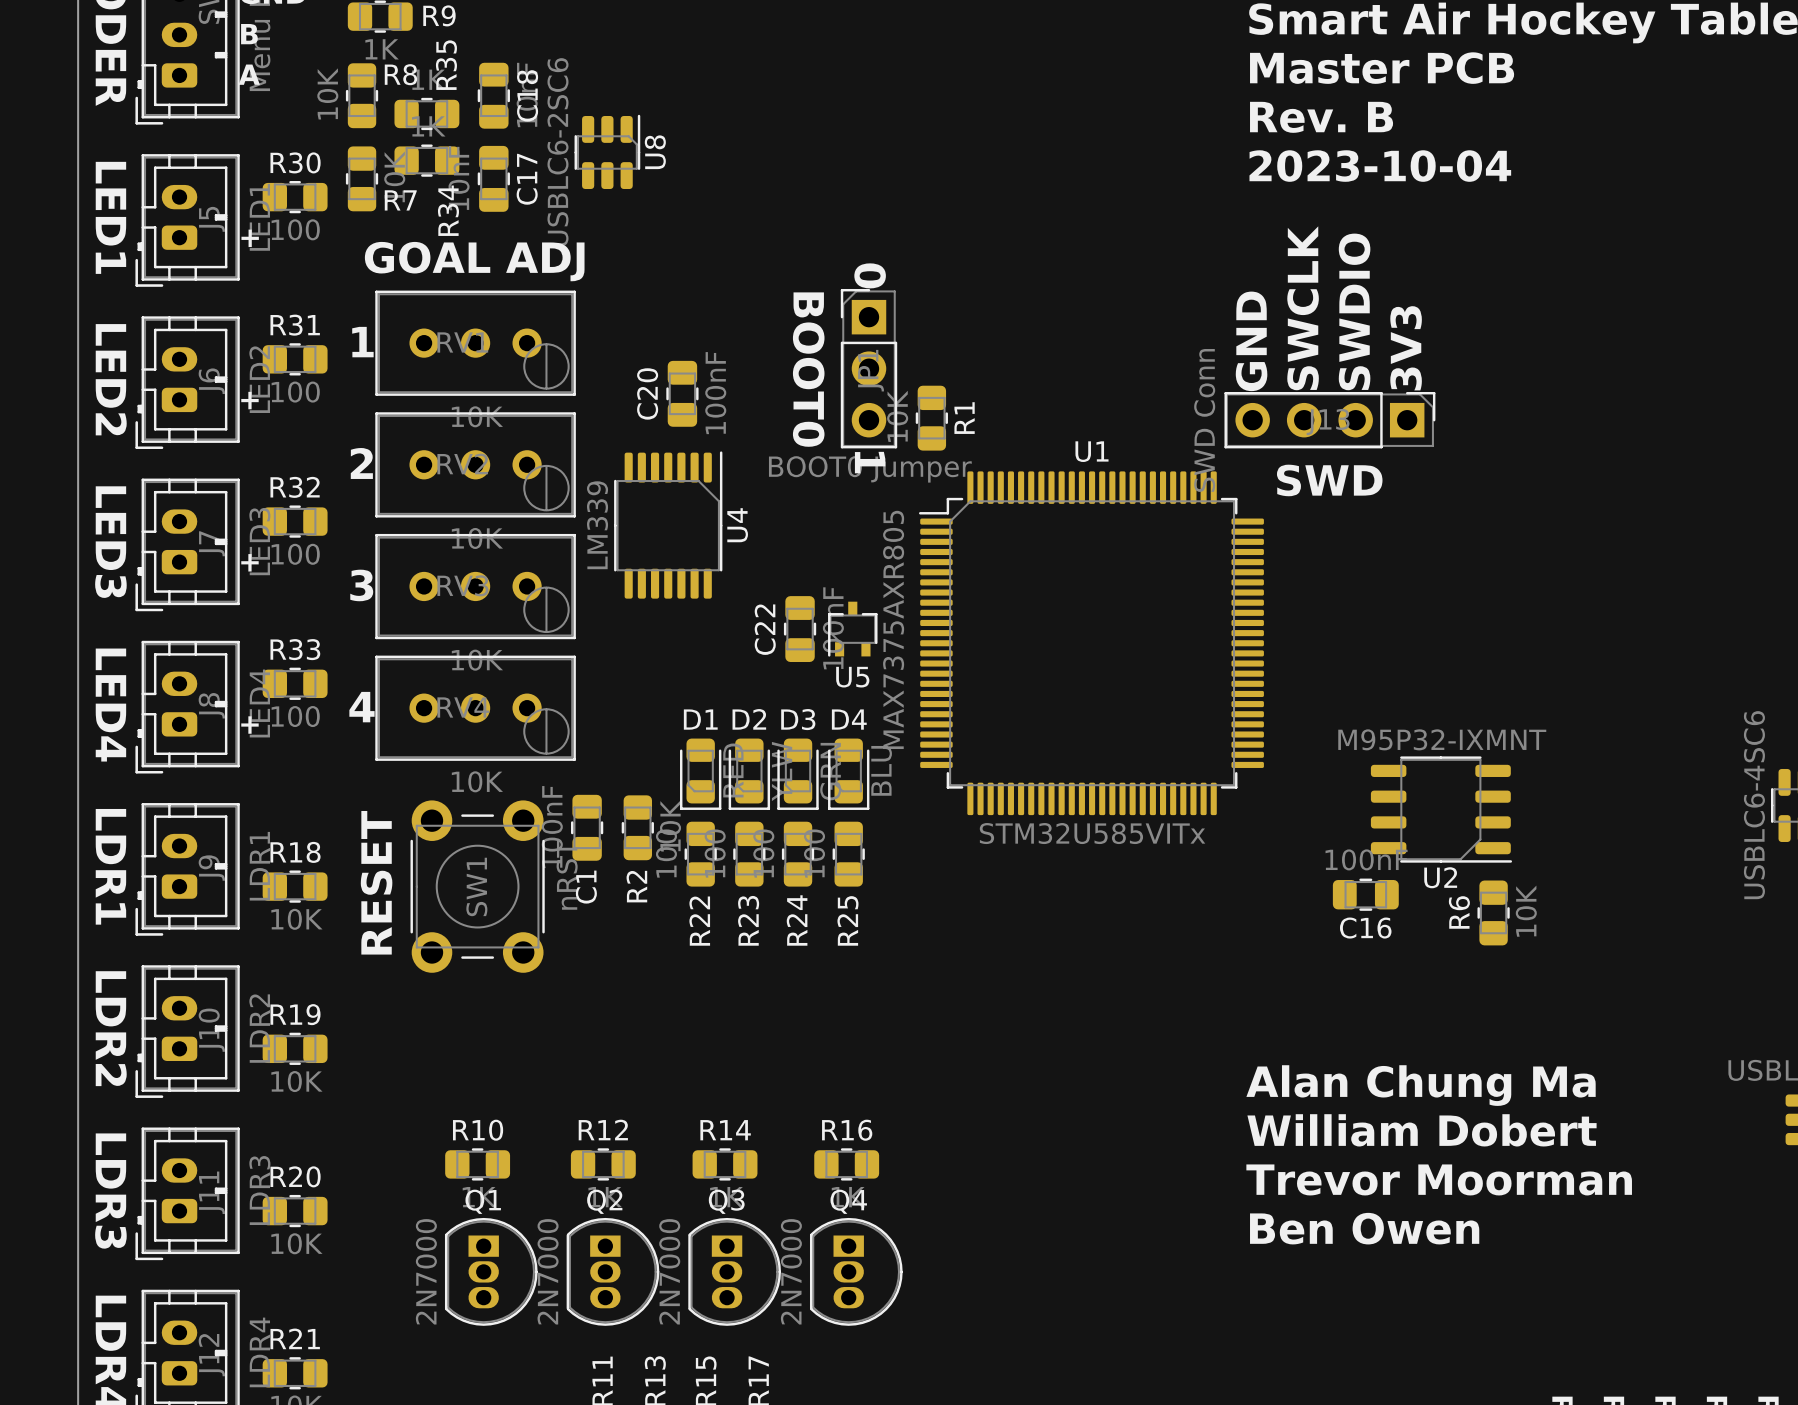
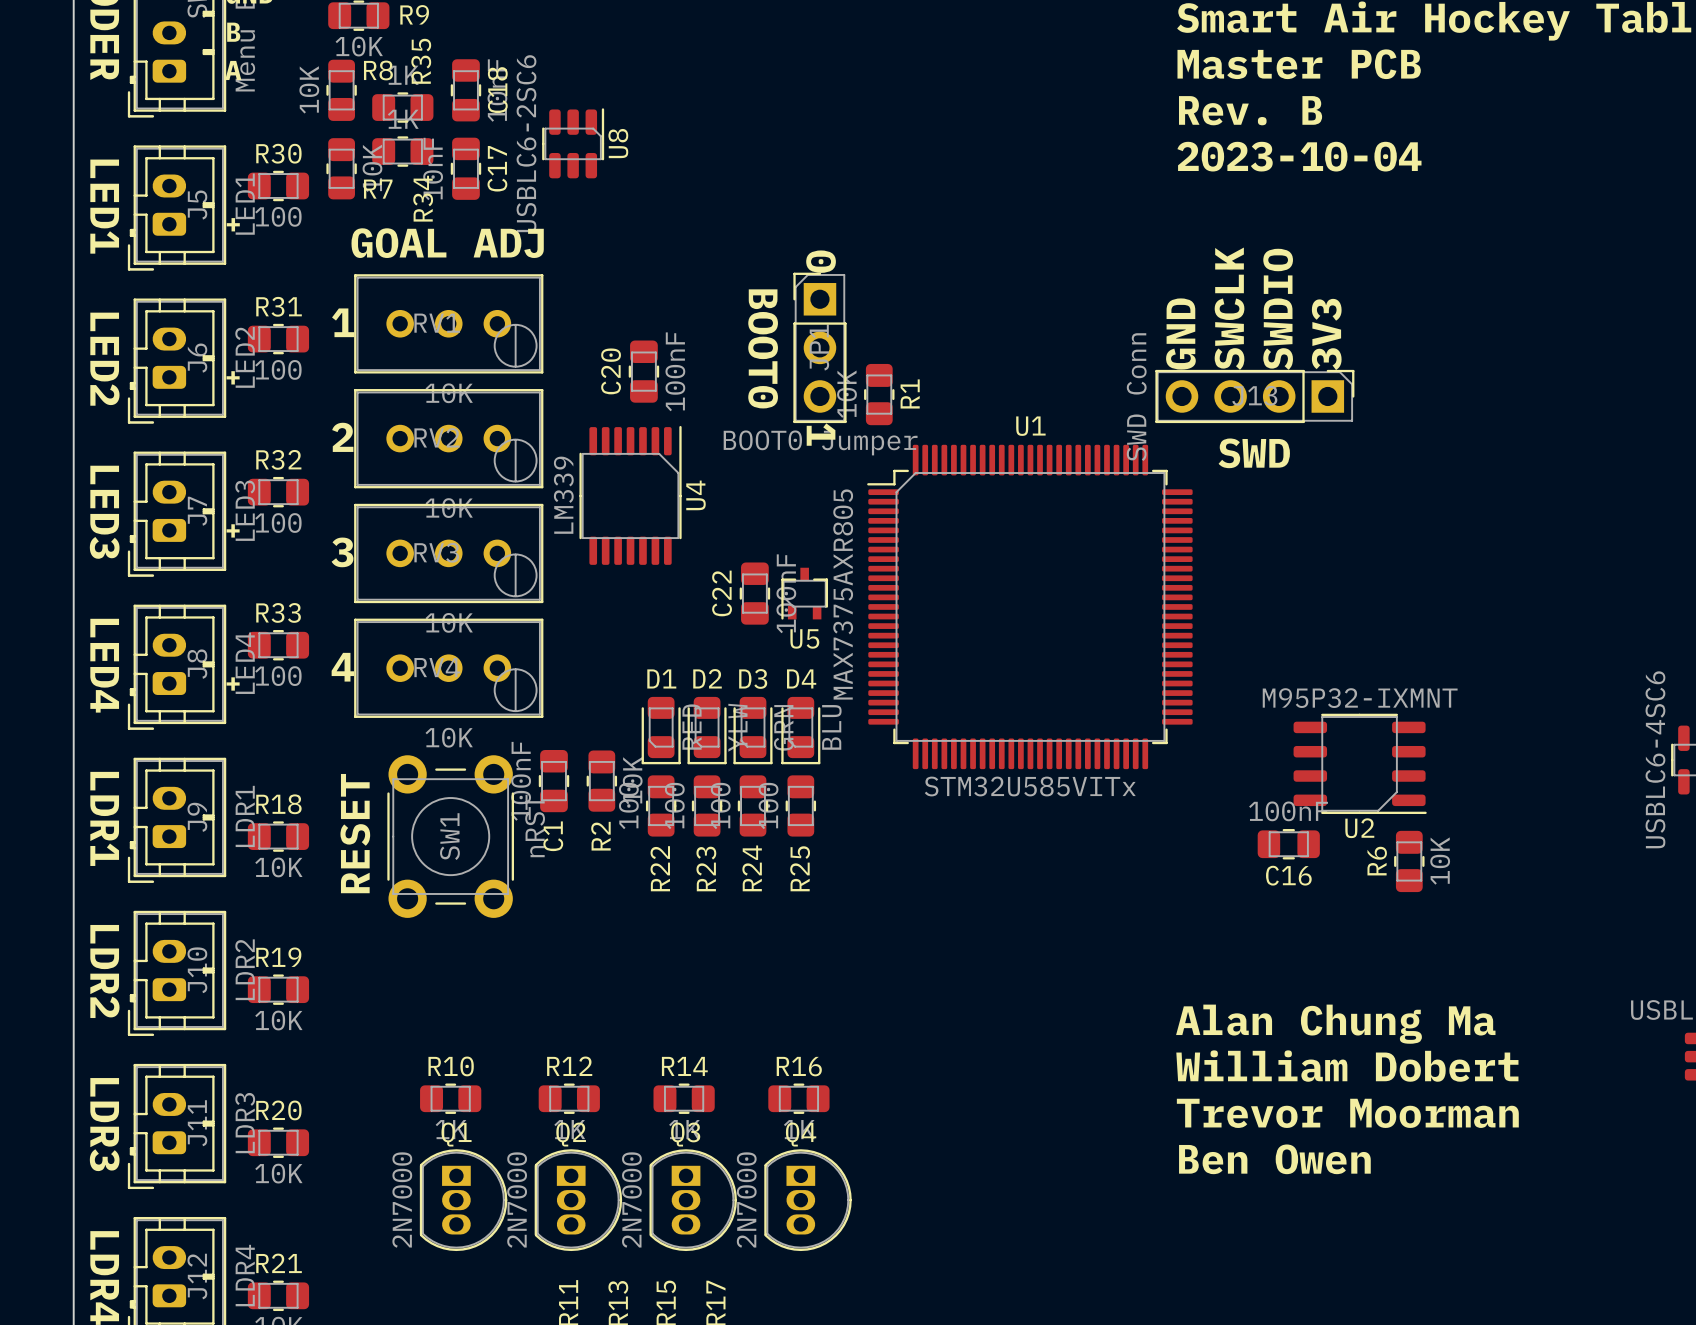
R9 value: 1K (382, 49) -> 10K (359, 46)

